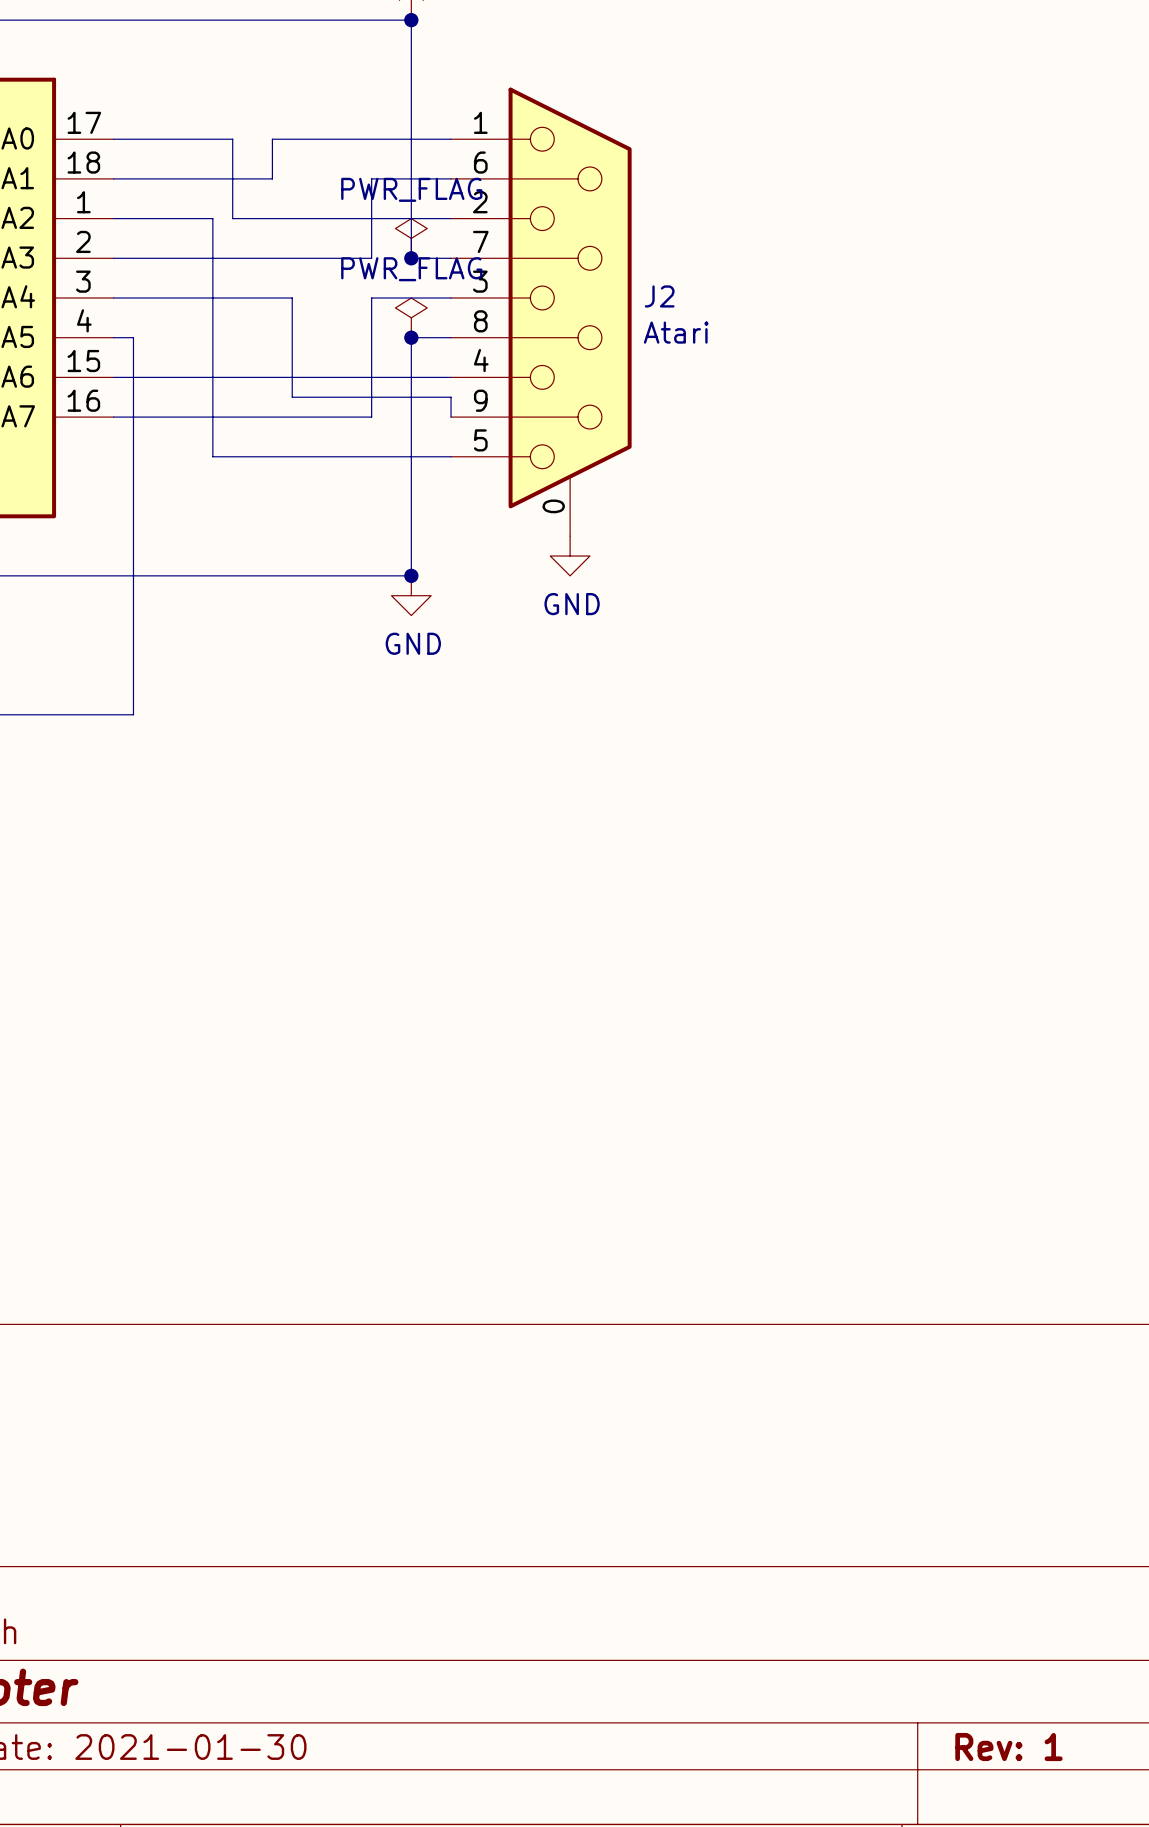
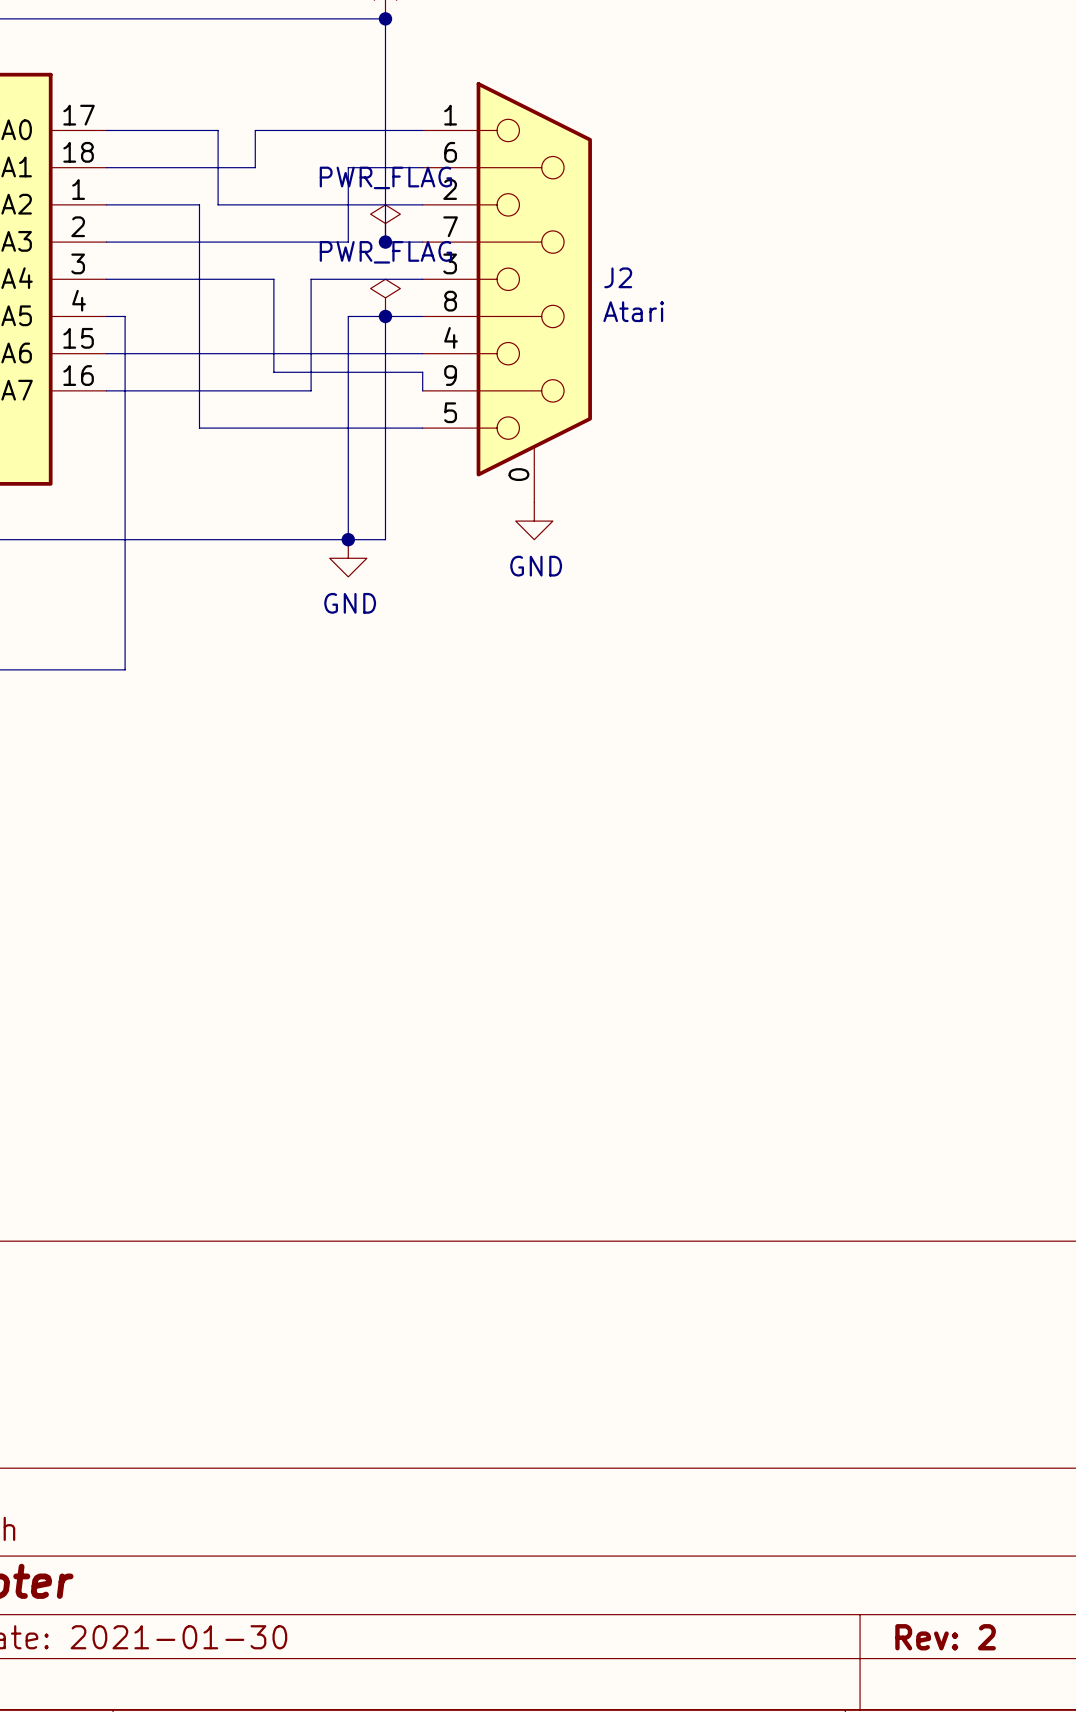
wire: (371, 298) (371, 337) -> (385, 316) (348, 316)
wire: (331, 417) (371, 417) -> (311, 390) (311, 279) (348, 279)
wire: none -> (348, 390) (348, 539)
junction position: (411, 575) -> (348, 539)
power symbol position: GND (411, 595) -> GND (348, 558)
title block: Rev: 1 (1008, 1747) -> Rev: 2 (945, 1637)

